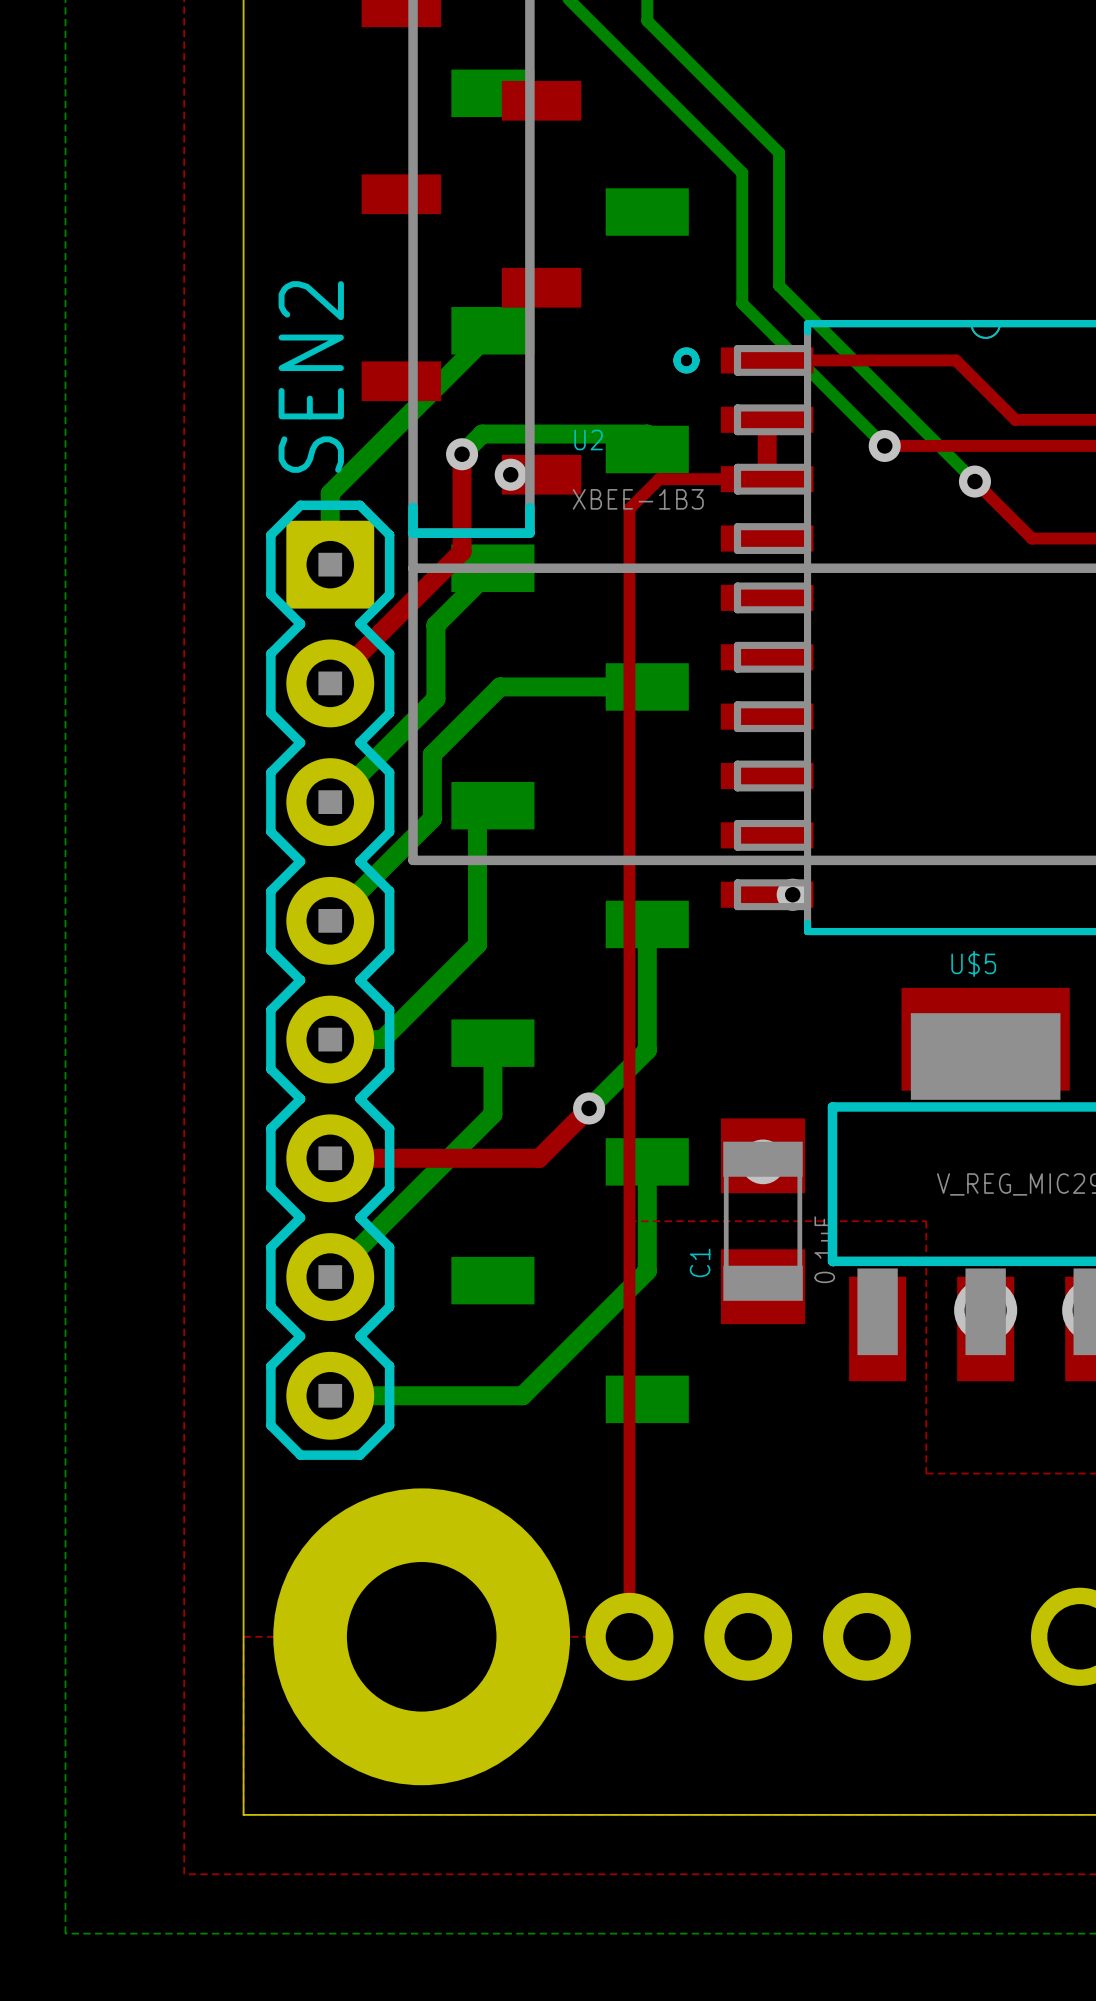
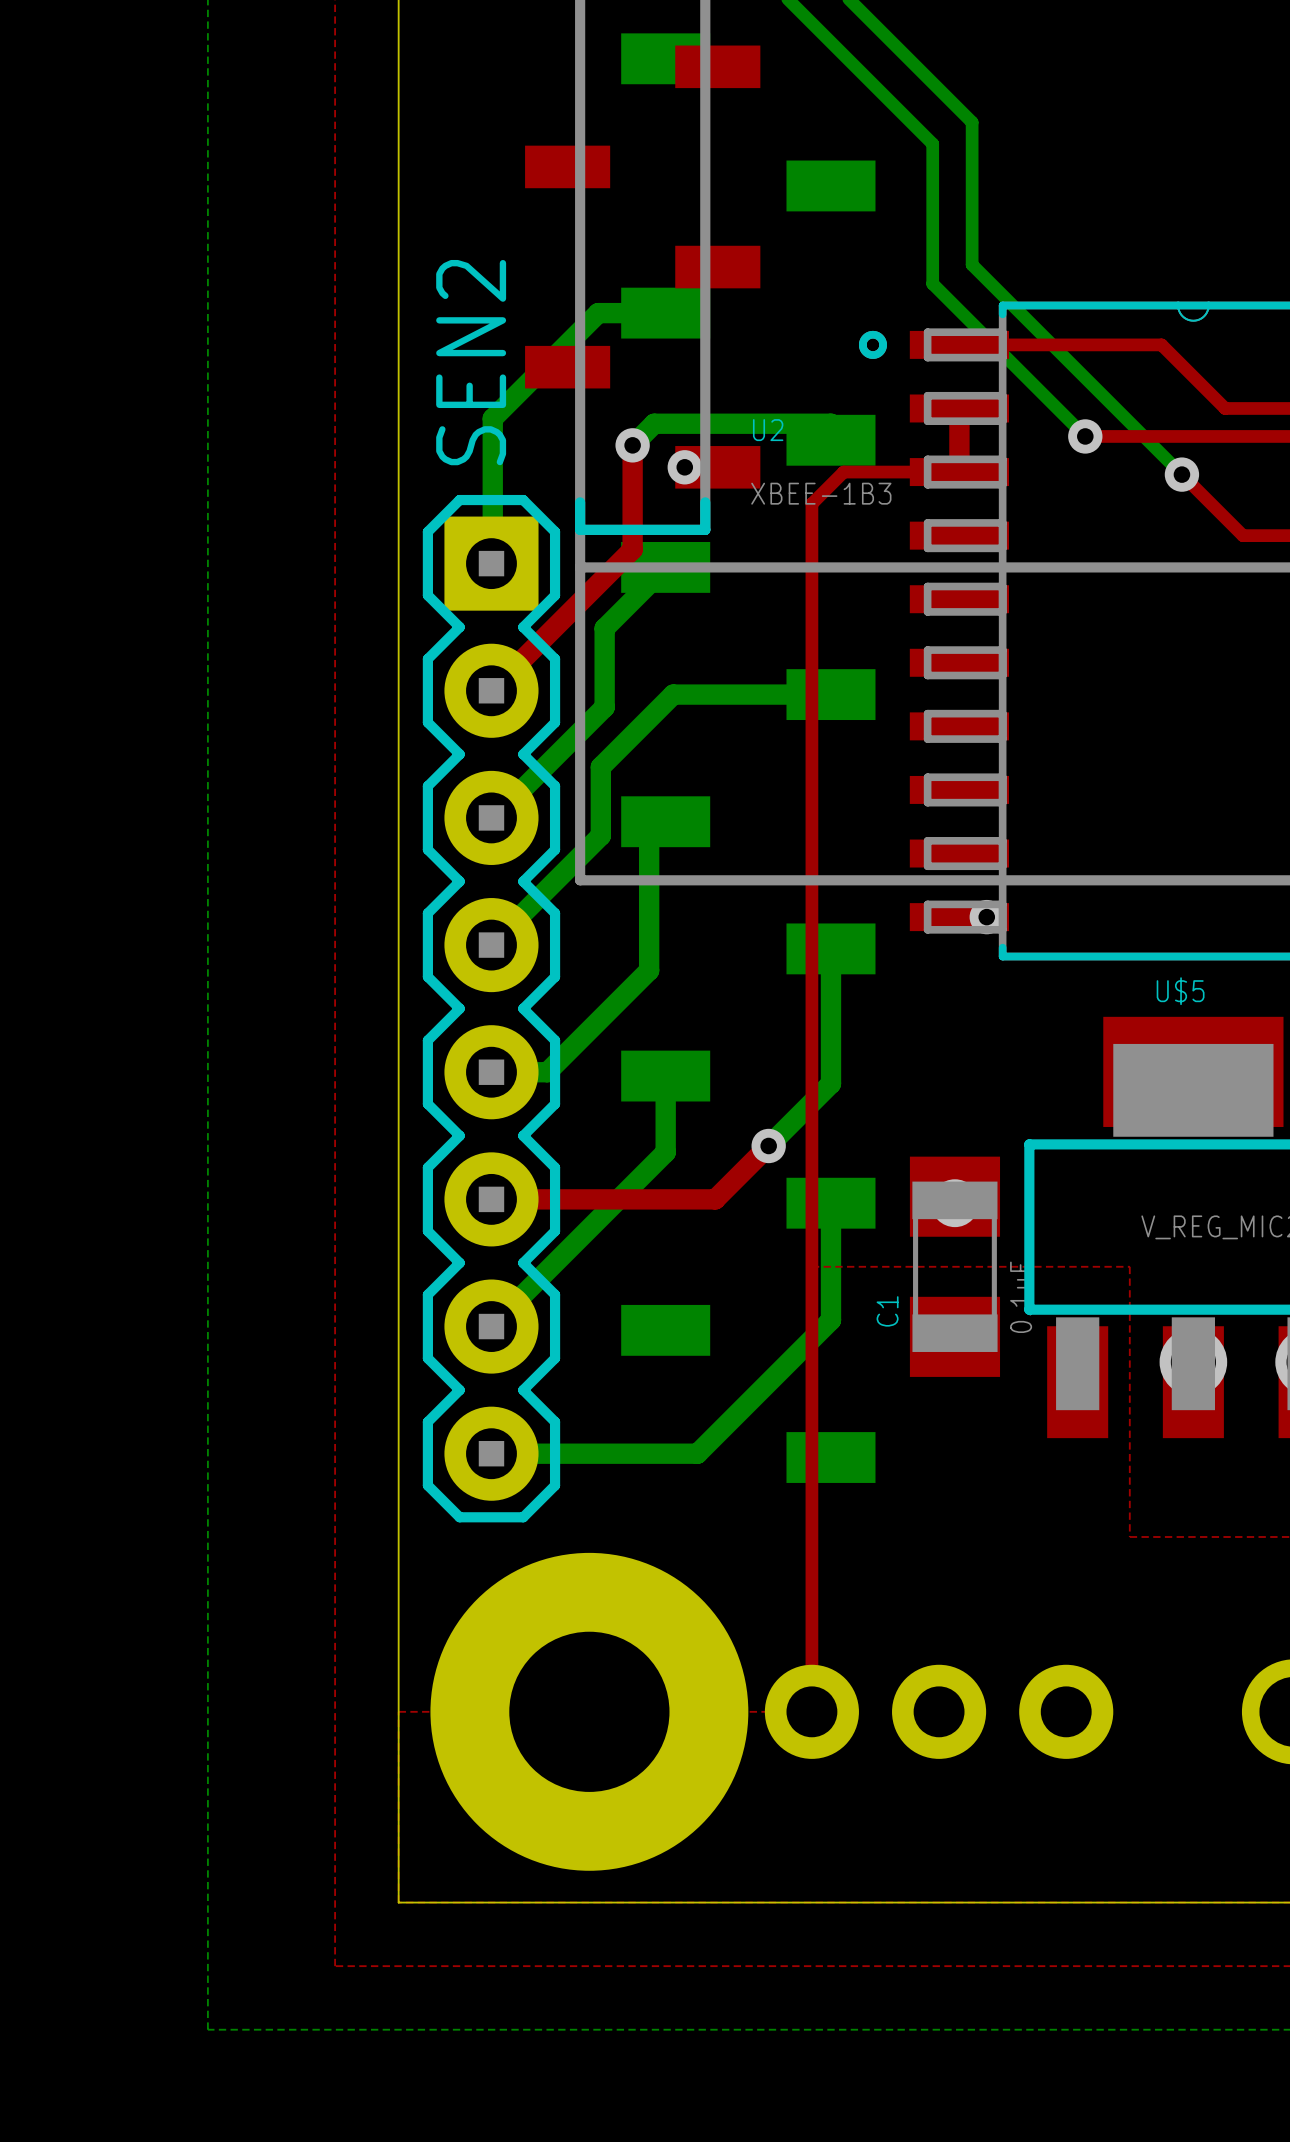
bottom track: (492, 330) (330, 493) (330, 564) -> (665, 313) (598, 313) (492, 418) (491, 563)

